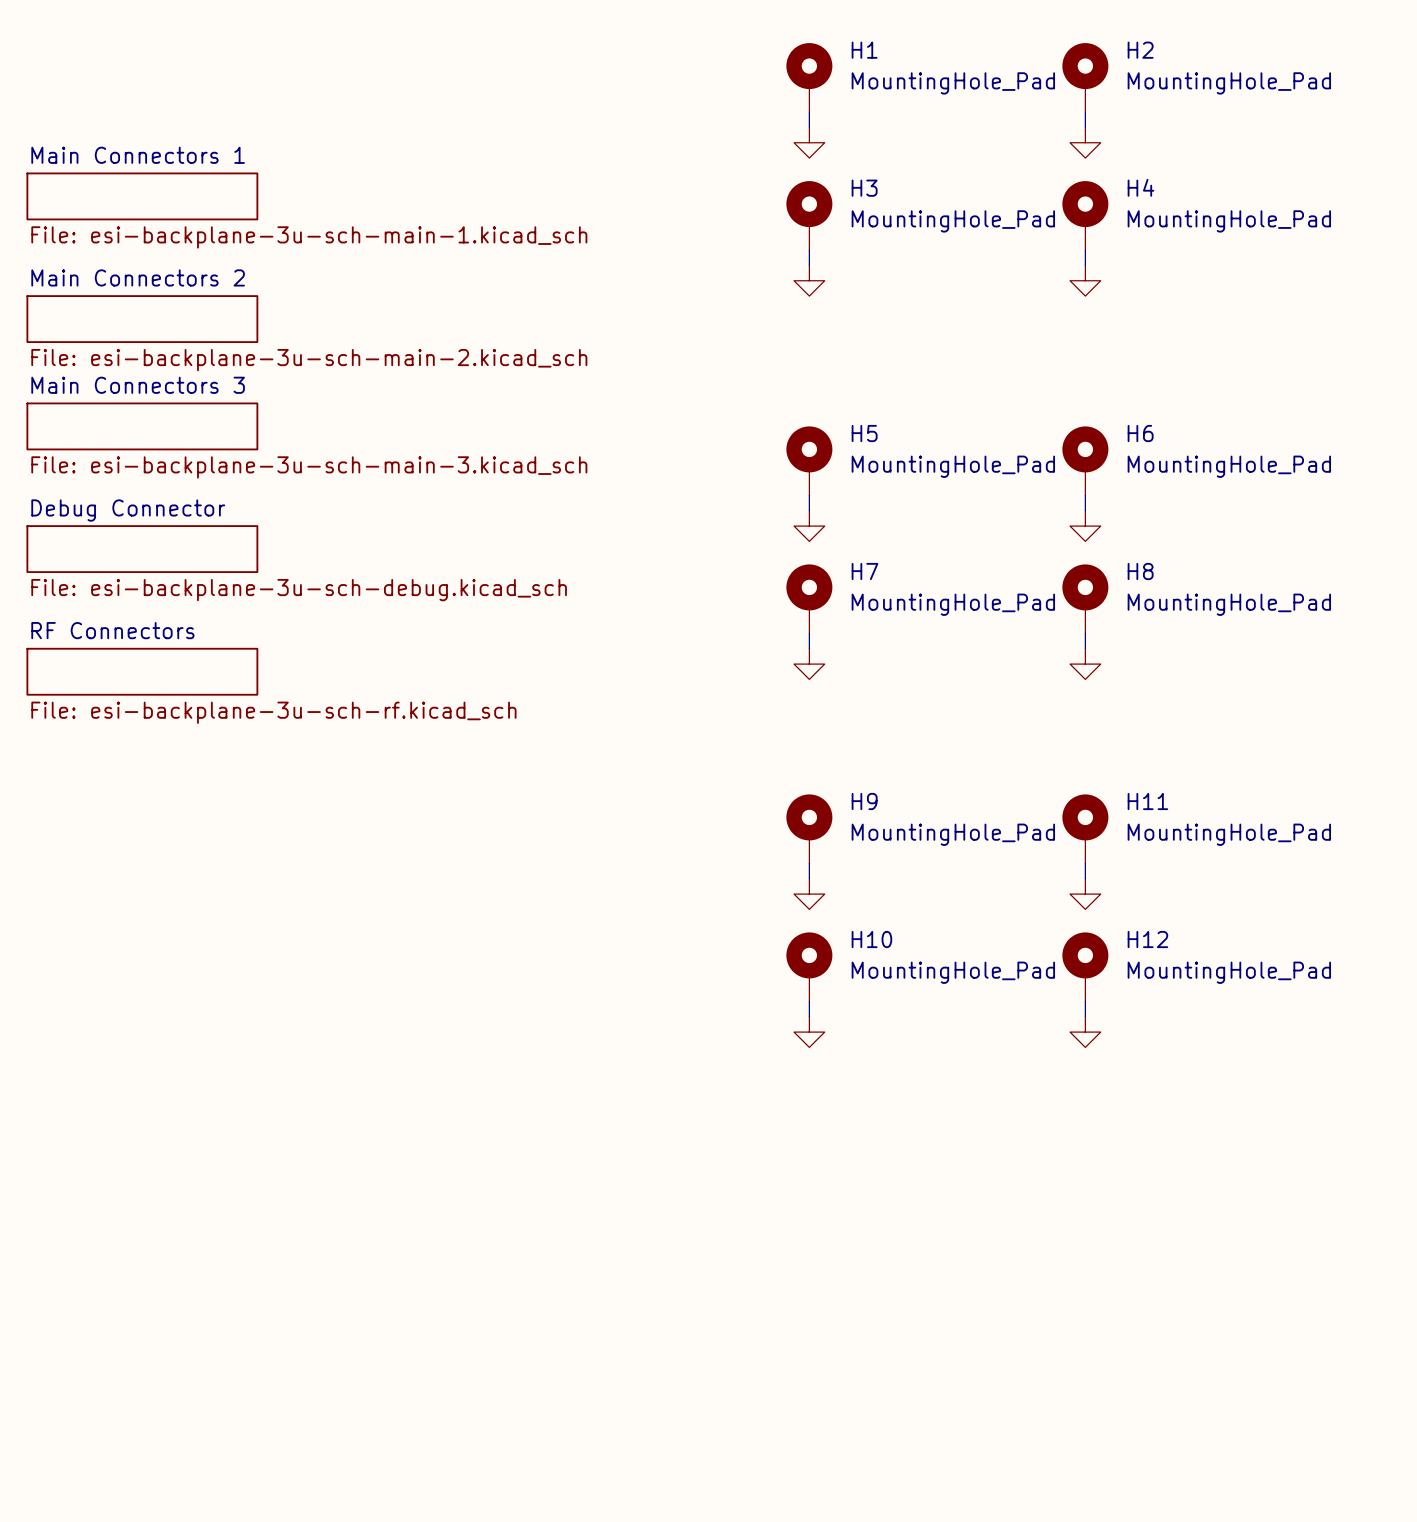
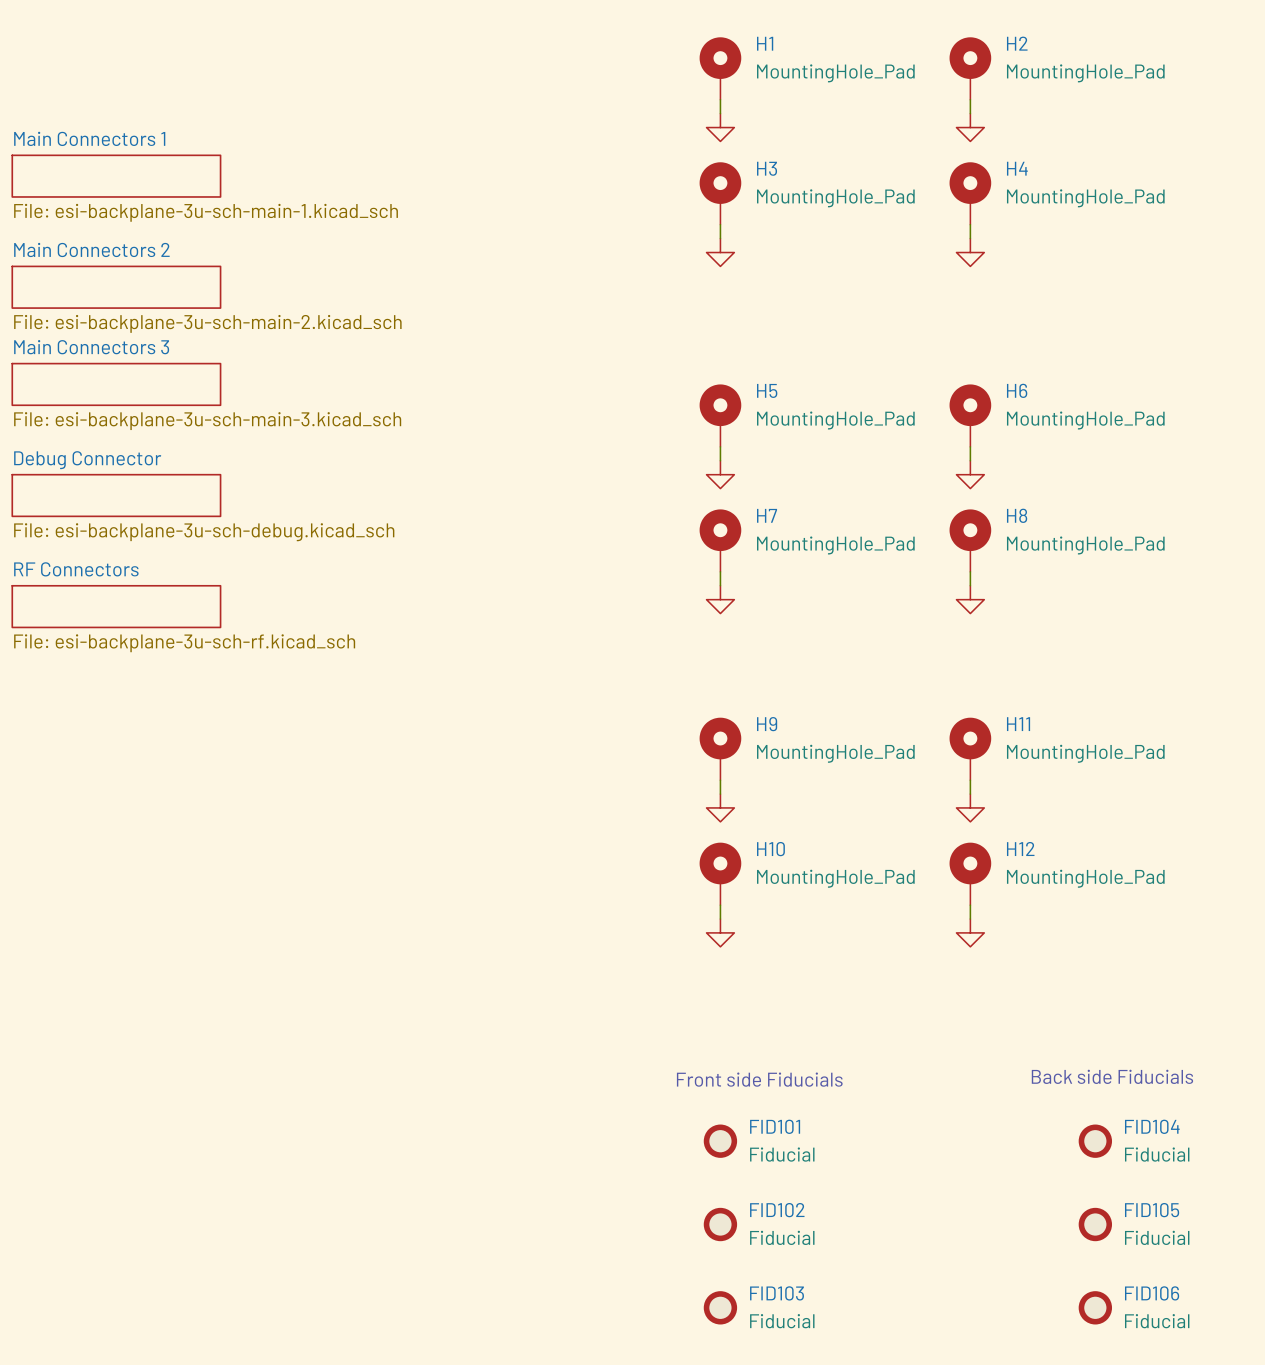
text: none -> Back side Fiducials (1112, 1076)
text: none -> Front side Fiducials (759, 1079)
FID101: none -> Fiducial (720, 1141)
FID104: none -> Fiducial (1095, 1141)
FID102: none -> Fiducial (720, 1224)
FID105: none -> Fiducial (1095, 1224)
FID103: none -> Fiducial (720, 1307)
FID106: none -> Fiducial (1095, 1307)

